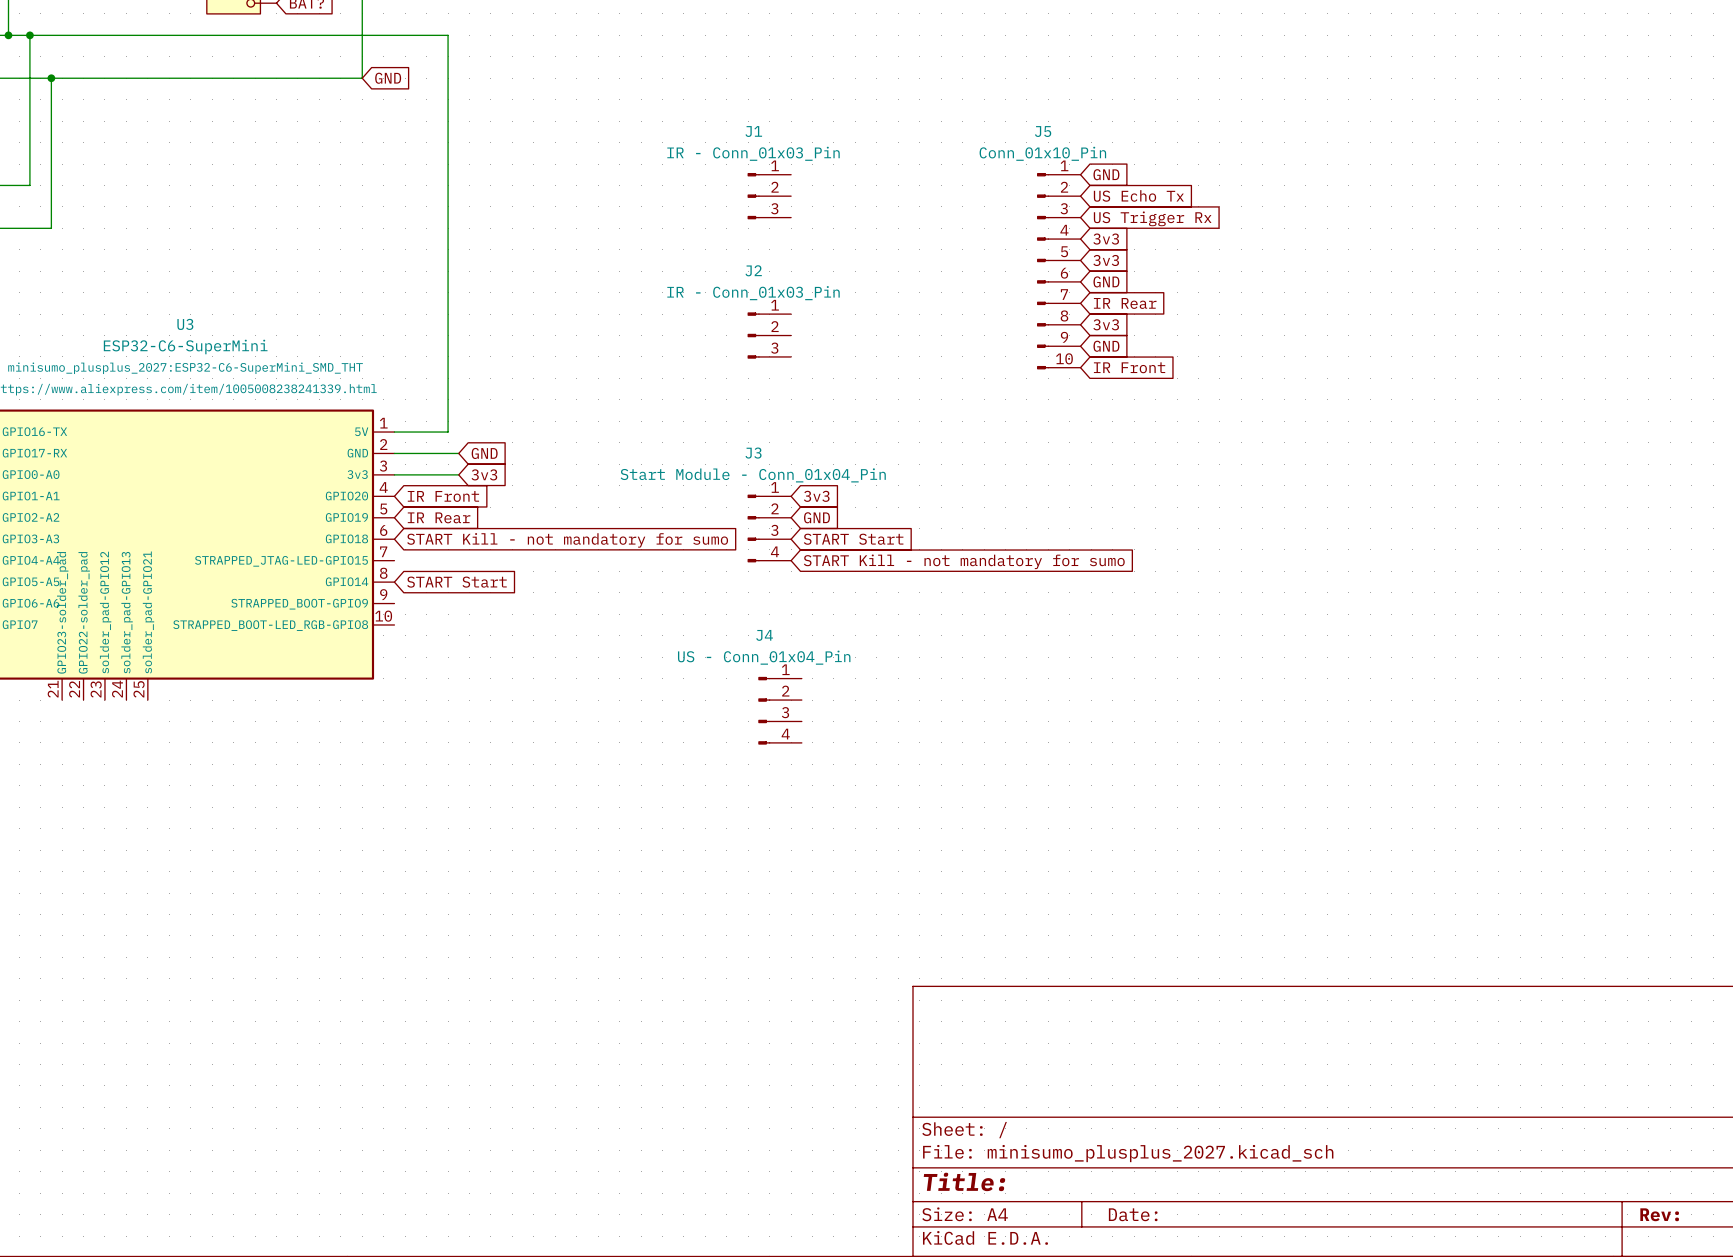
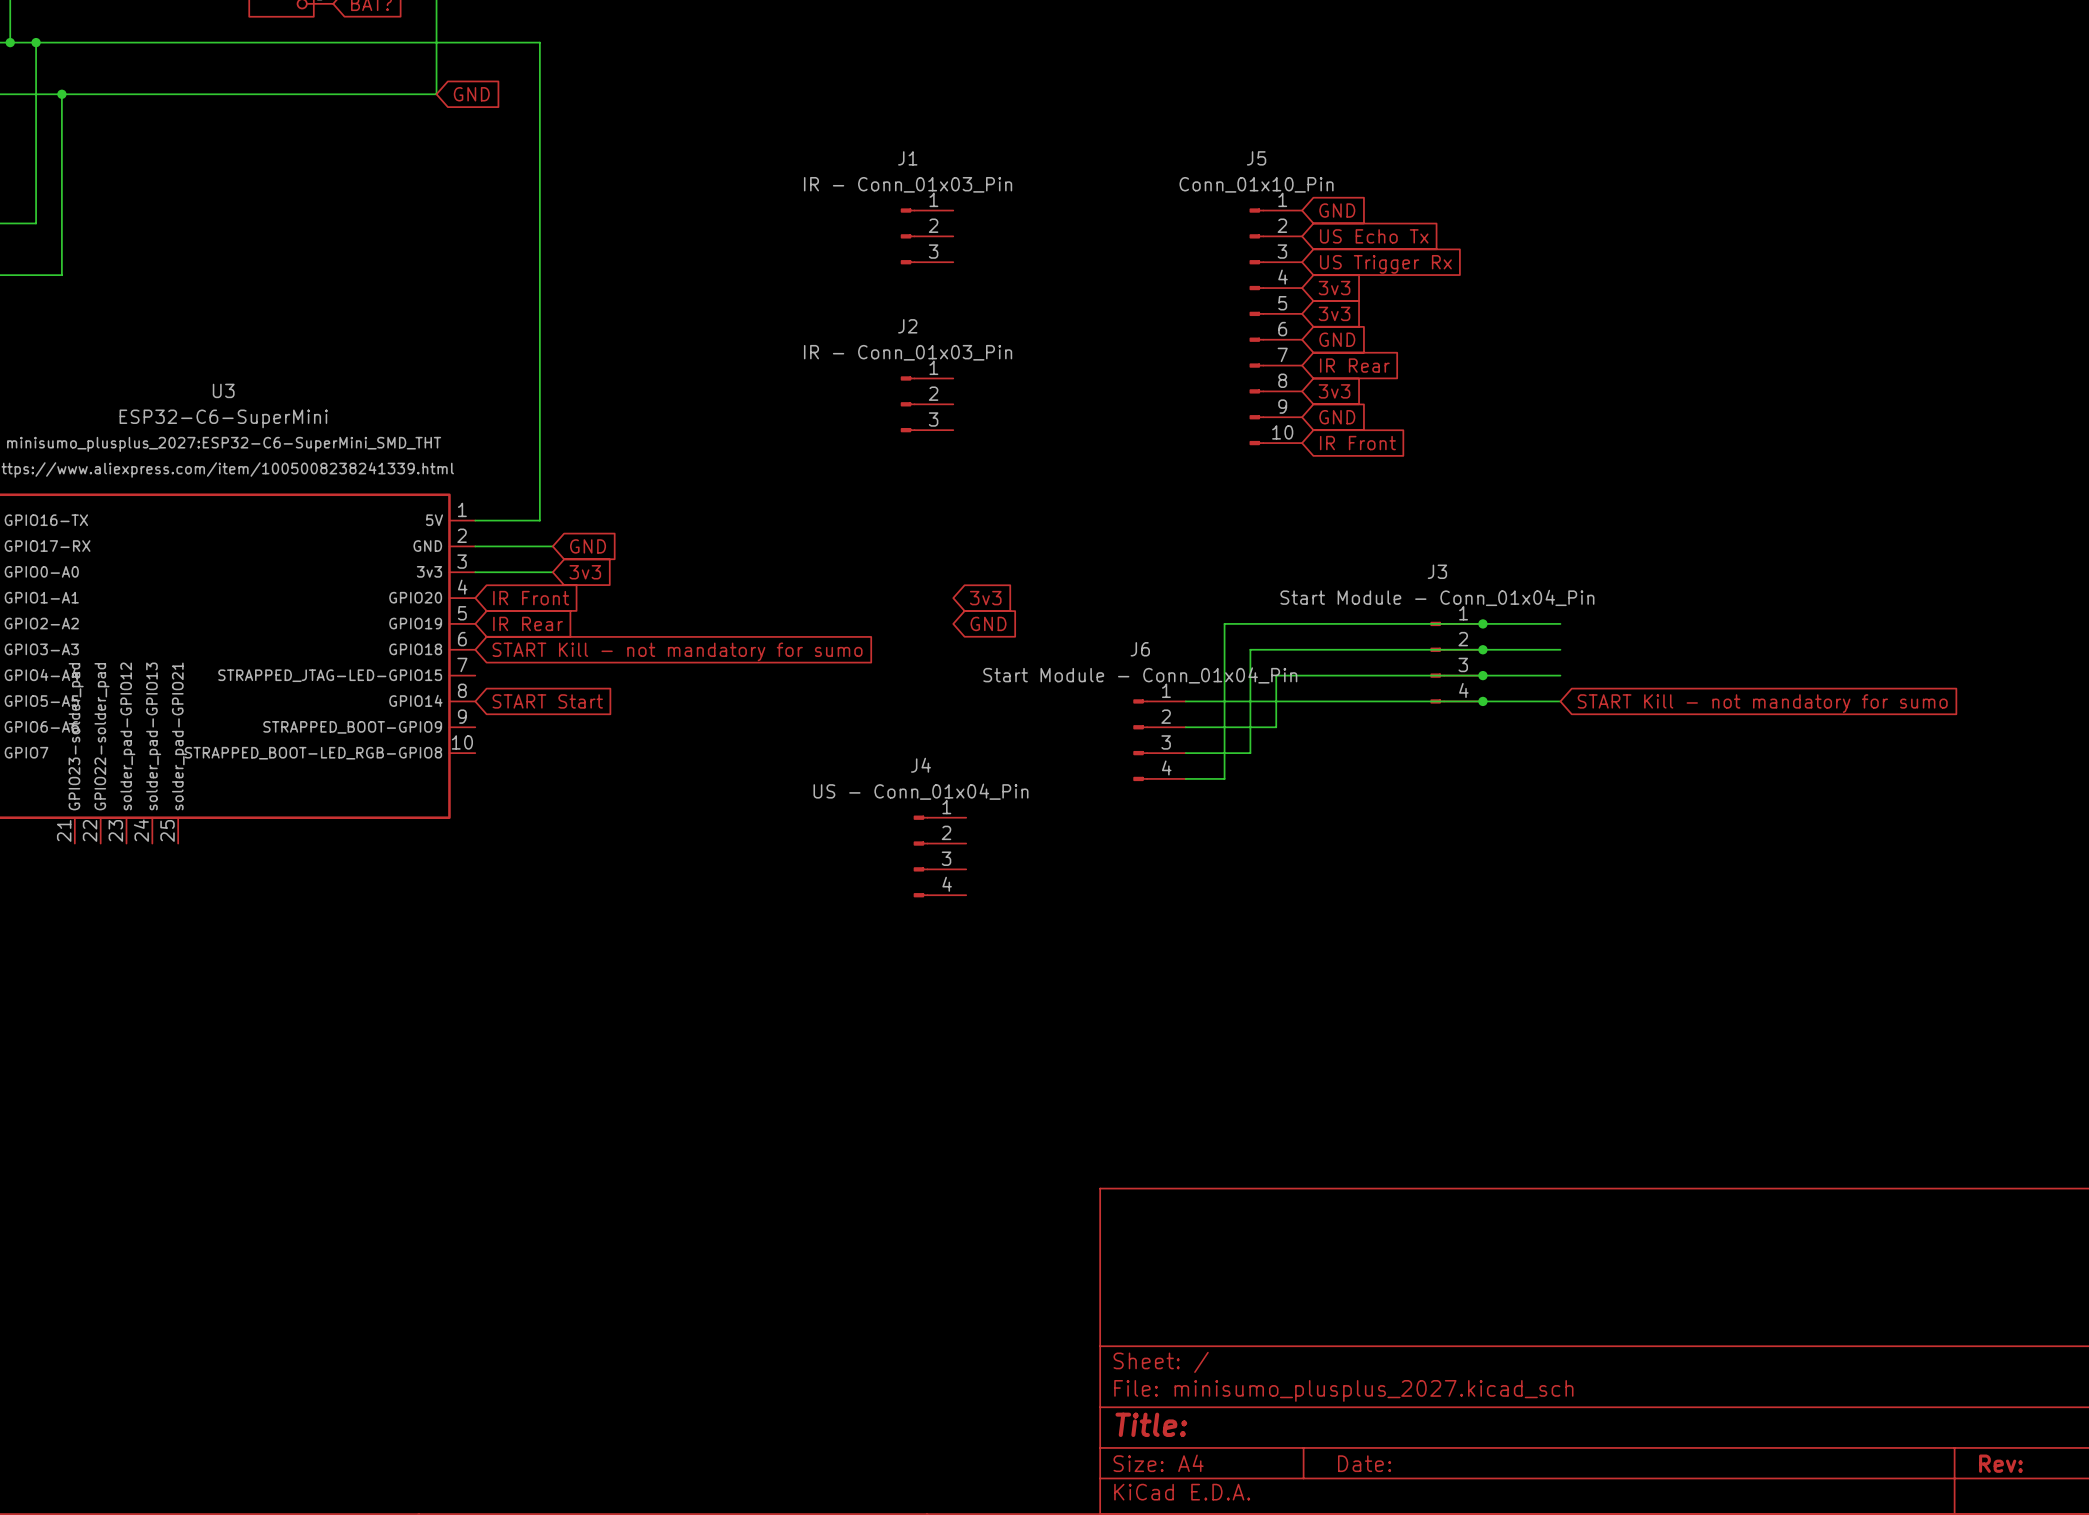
junction: none -> (1482, 623)
wire: none -> (1560, 623) (1224, 623) (1224, 778) (1185, 778)
J3 position: (769, 528) -> (1456, 662)
global label: START Start (853, 539) -> none
junction: none -> (1482, 649)
wire: none -> (1560, 649) (1250, 649) (1250, 753) (1185, 753)
junction: none -> (1482, 675)
wire: none -> (1560, 675) (1276, 675) (1276, 727) (1185, 727)
global label: START Kill - not mandatory for sumo (964, 561) -> none
wire: none -> (1185, 701) (1560, 701)
junction: none -> (1482, 701)
global label: none -> START Kill - not mandatory for sumo (1762, 703)
J6: none -> Start Module - Conn_01x04_Pin (1159, 740)

